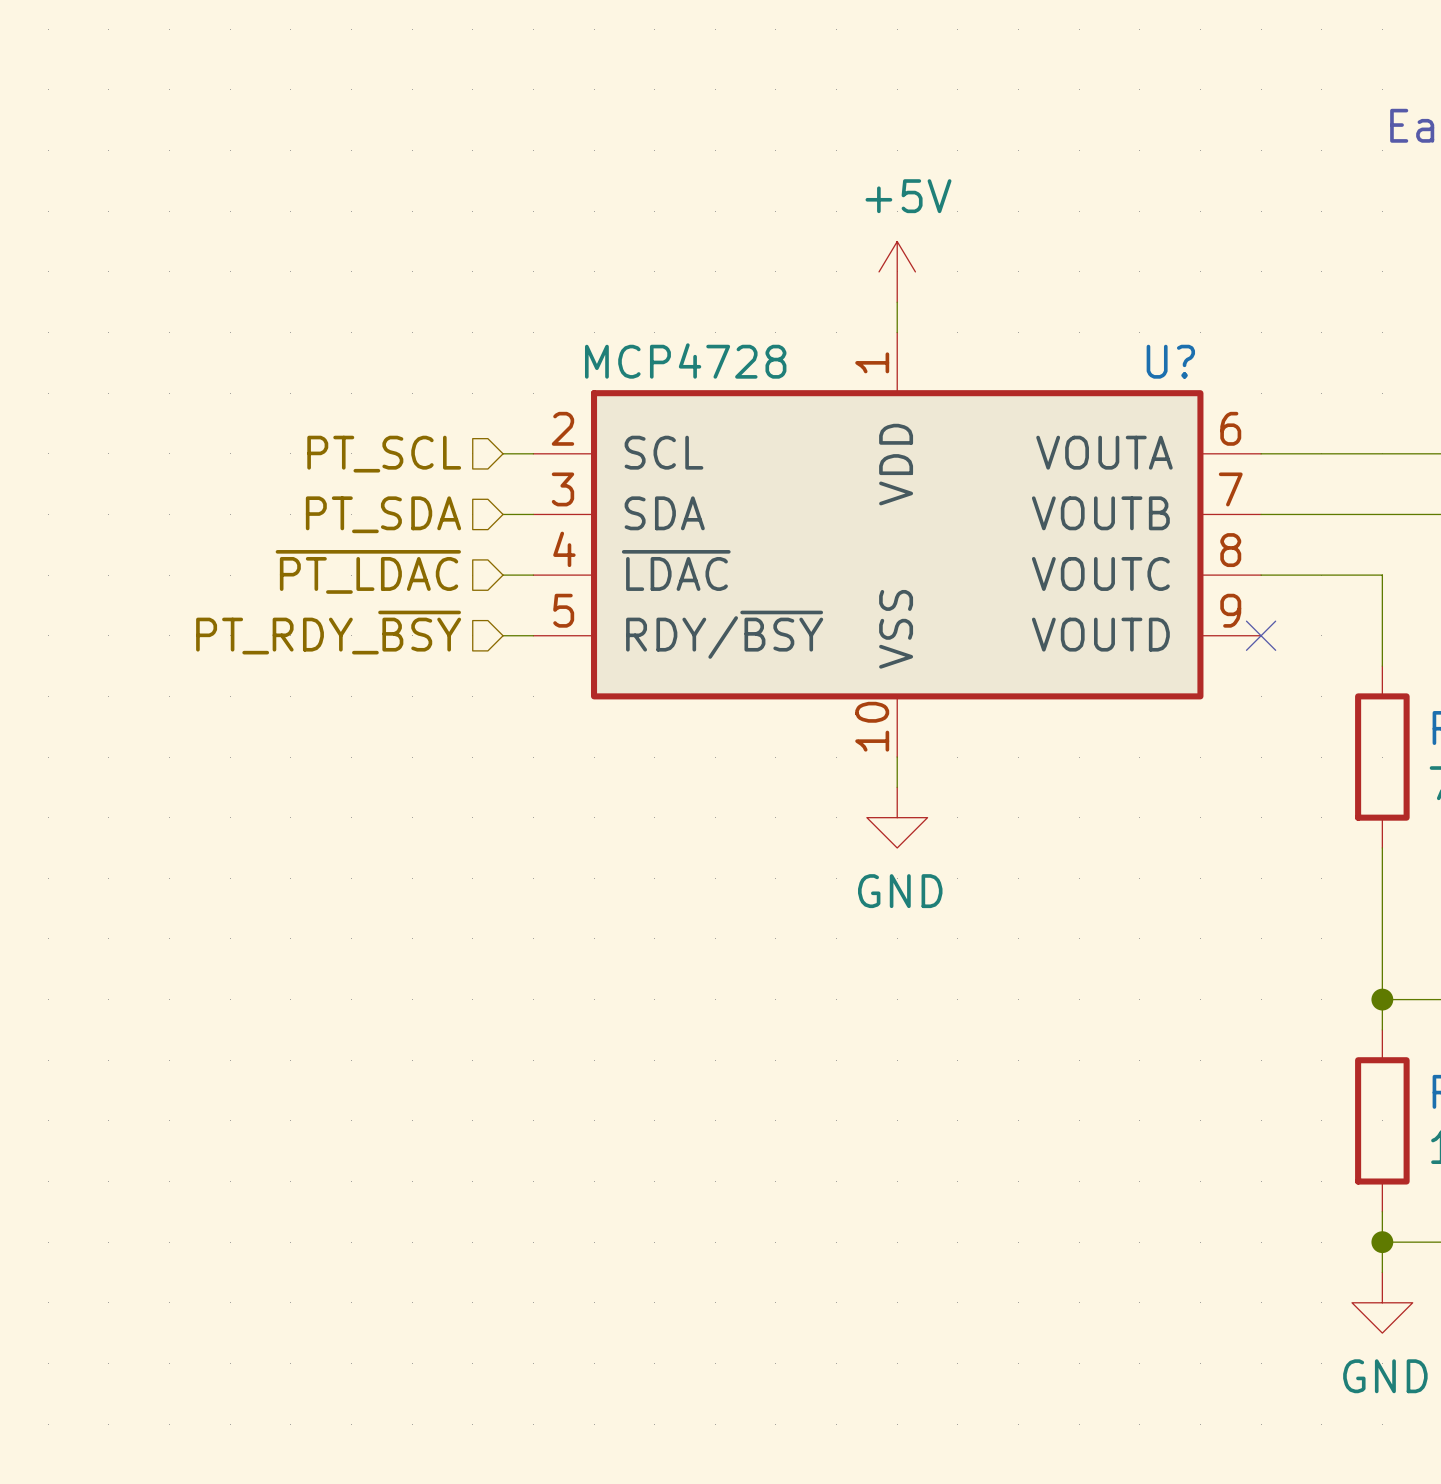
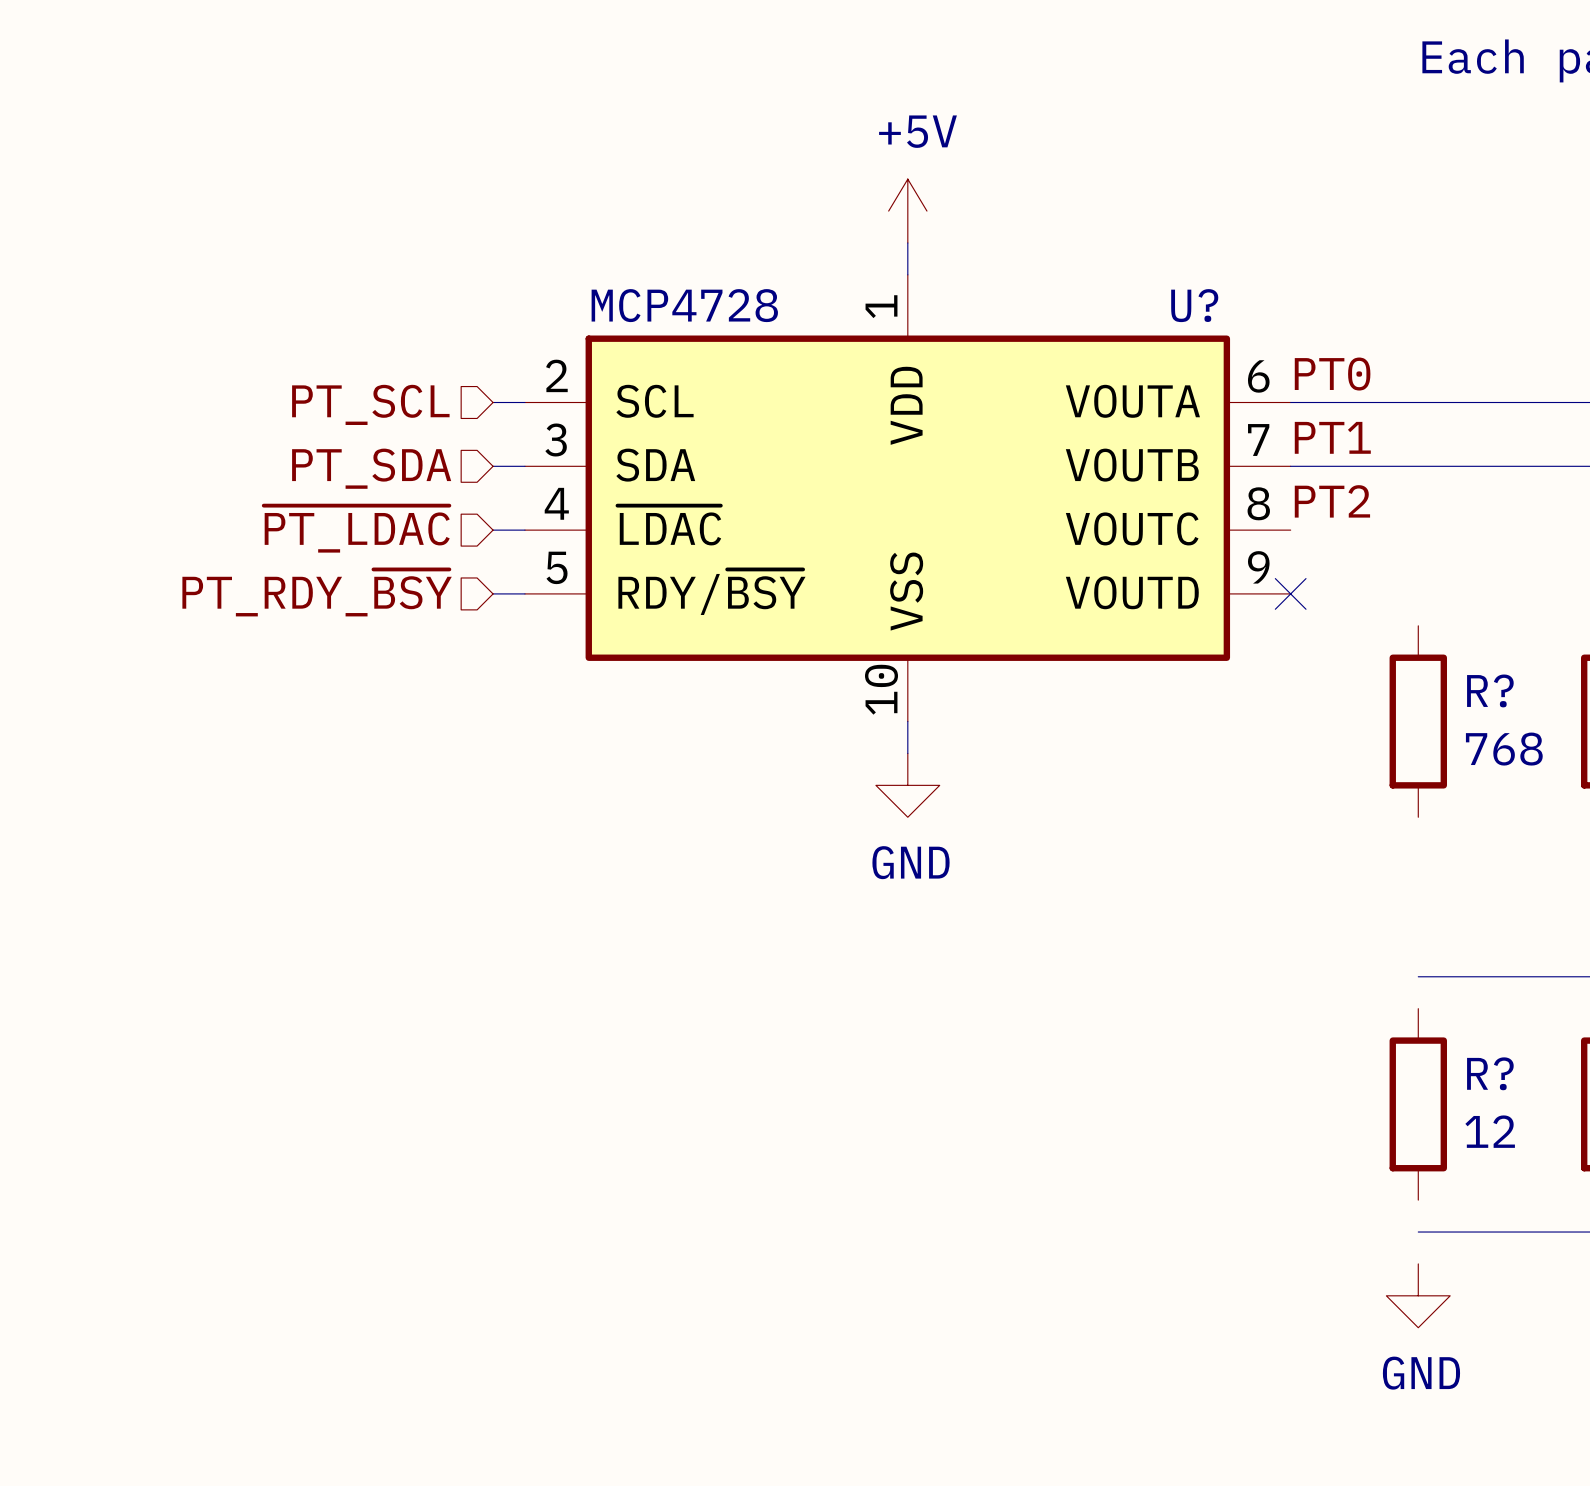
label: none -> PT0 (1332, 374)
label: none -> PT1 (1332, 437)
label: none -> PT2 (1332, 501)
wire: (1261, 575) (1382, 575) (1382, 666) -> none
wire: (1382, 847) (1382, 1029) -> none
junction: (1382, 999) -> none
wire: (1382, 1211) (1382, 1272) -> none
junction: (1382, 1242) -> none

